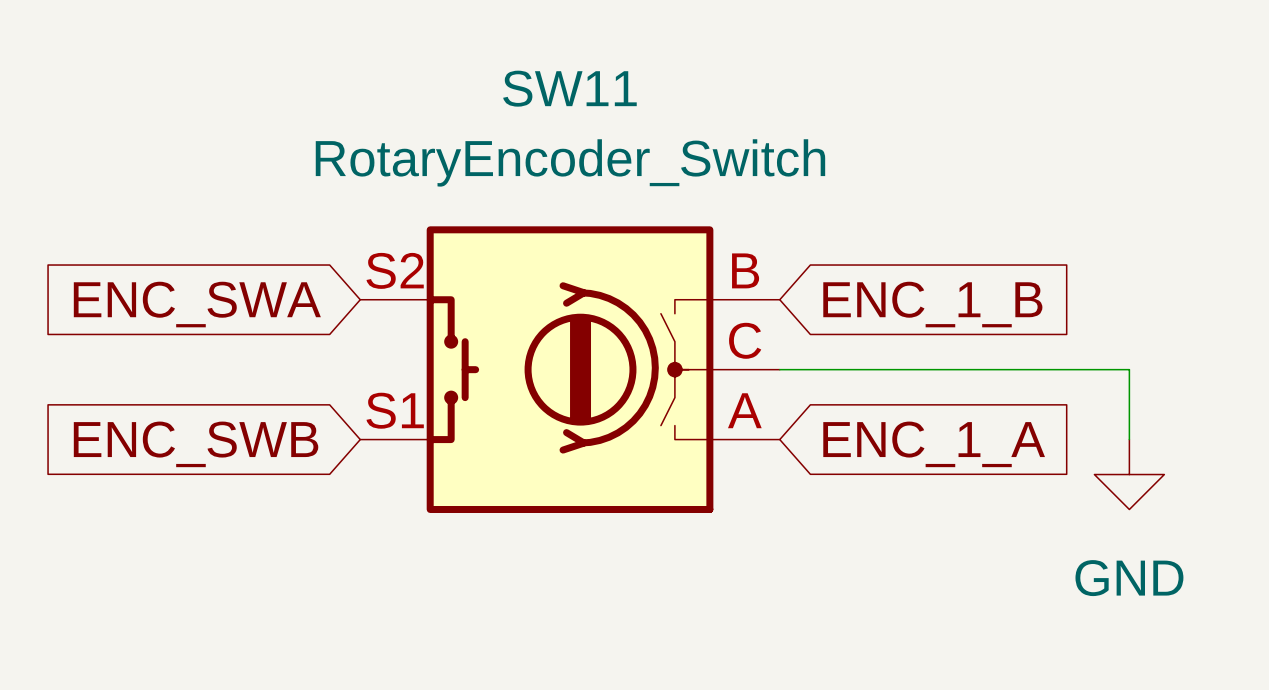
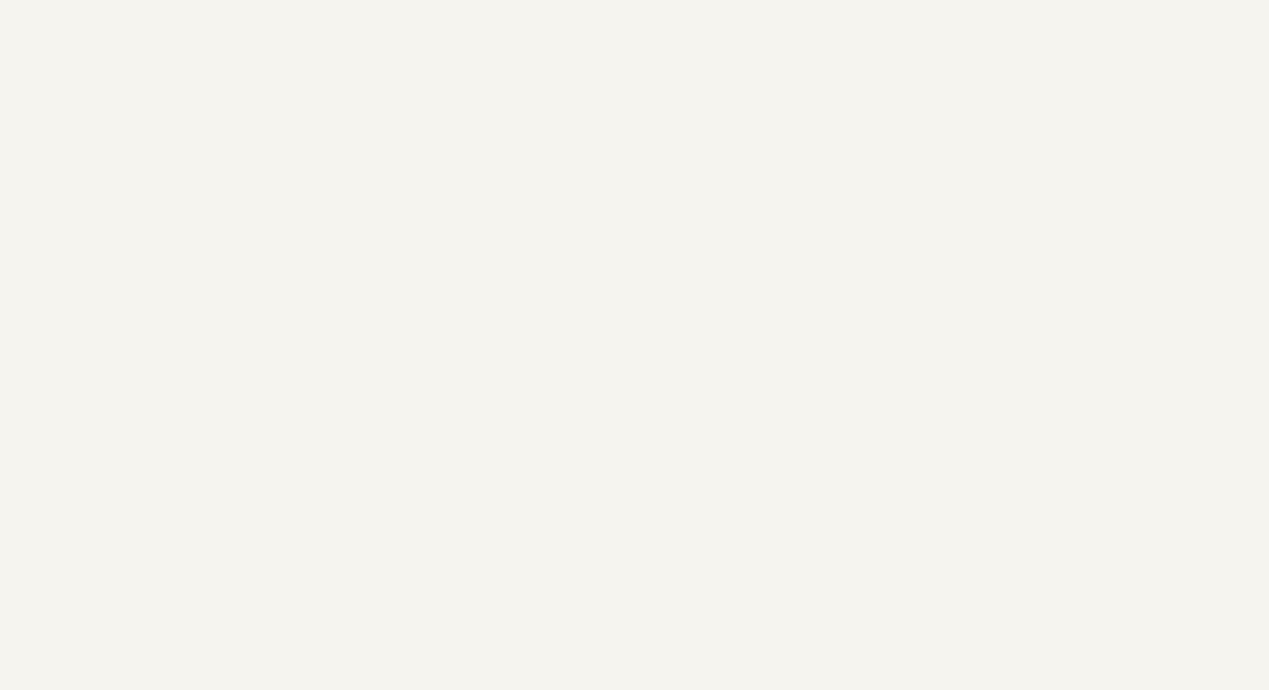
global label: ENC_SWA (197, 304) -> none
global label: ENC_1_B (932, 304) -> none
SW11: RotaryEncoder_Switch (570, 369) -> none
wire: (779, 369) (1129, 369) (1129, 439) -> none
global label: ENC_SWB (196, 444) -> none
global label: ENC_1_A (934, 444) -> none
power symbol: GND (1129, 474) -> none

